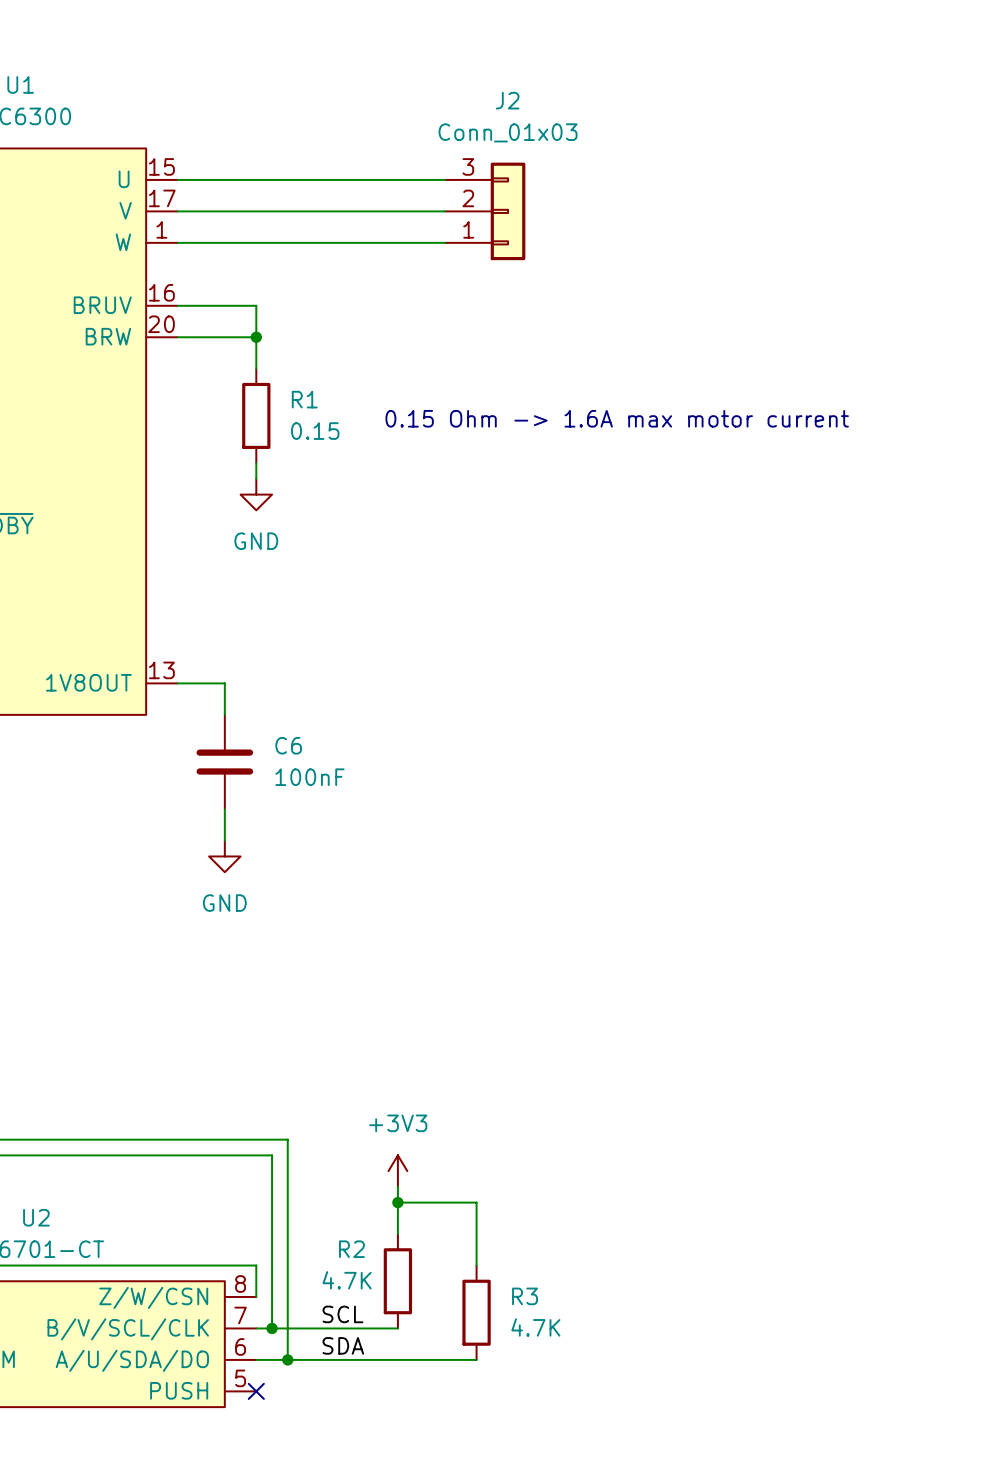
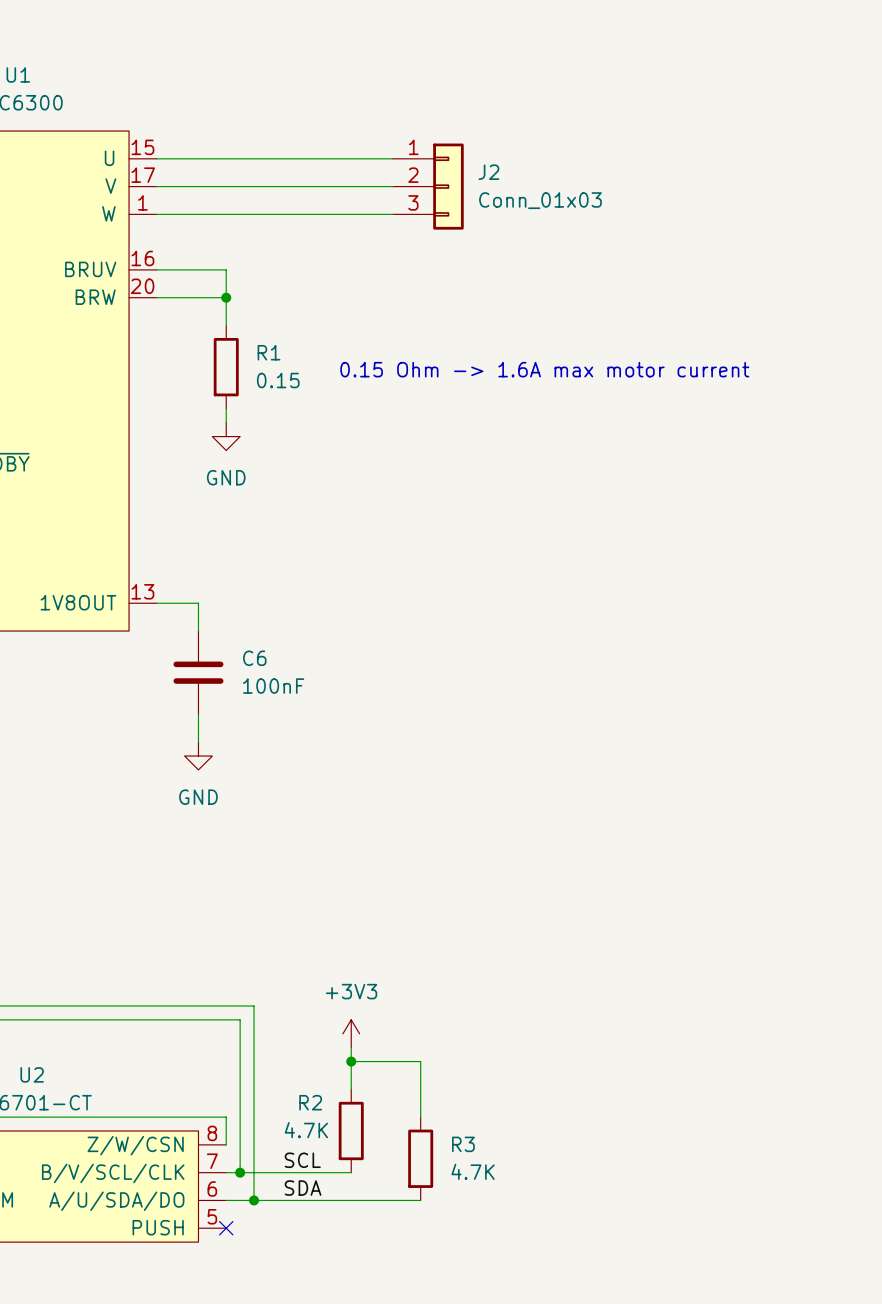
J2 name position: J2 (507, 100) -> J2 (488, 172)
J2 value position: Conn_01x03 (508, 132) -> Conn_01x03 (540, 200)
J2 flip: as is (508, 211) -> up-down (448, 186)

